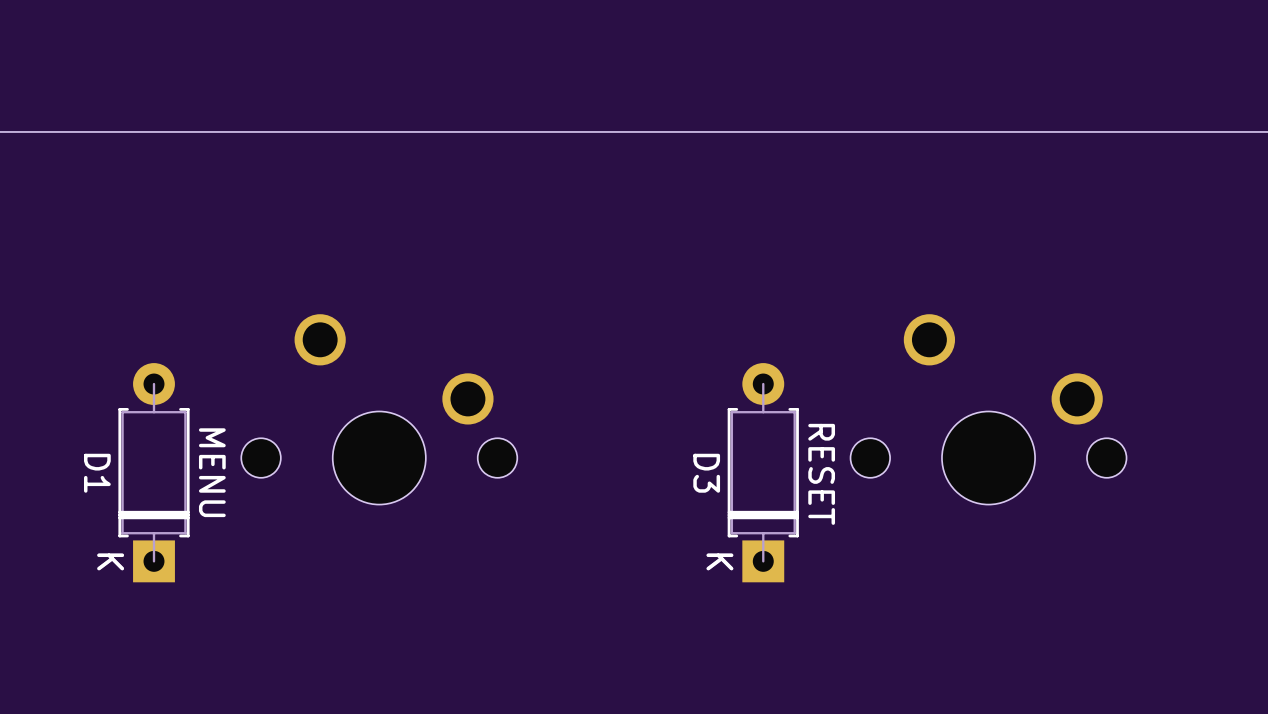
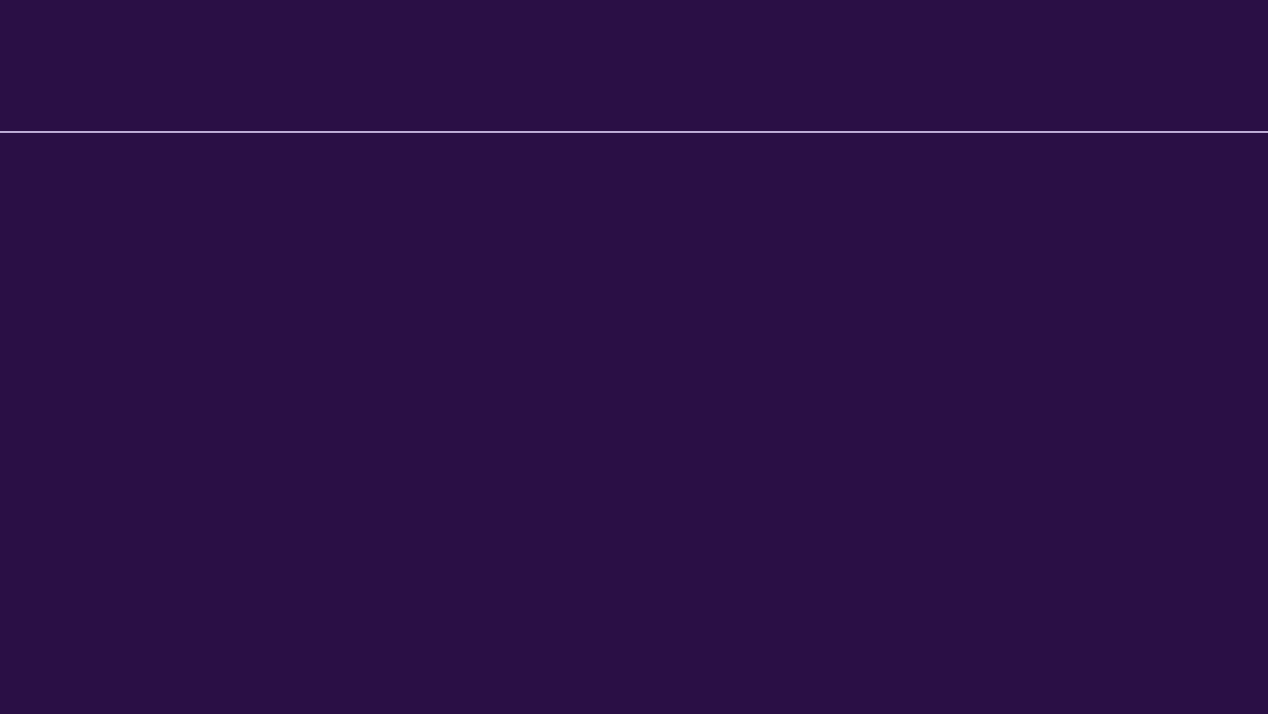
part: (379, 409) -> none
part: (988, 409) -> none
D1: MENU (154, 472) -> none
D3: RESET (763, 472) -> none

